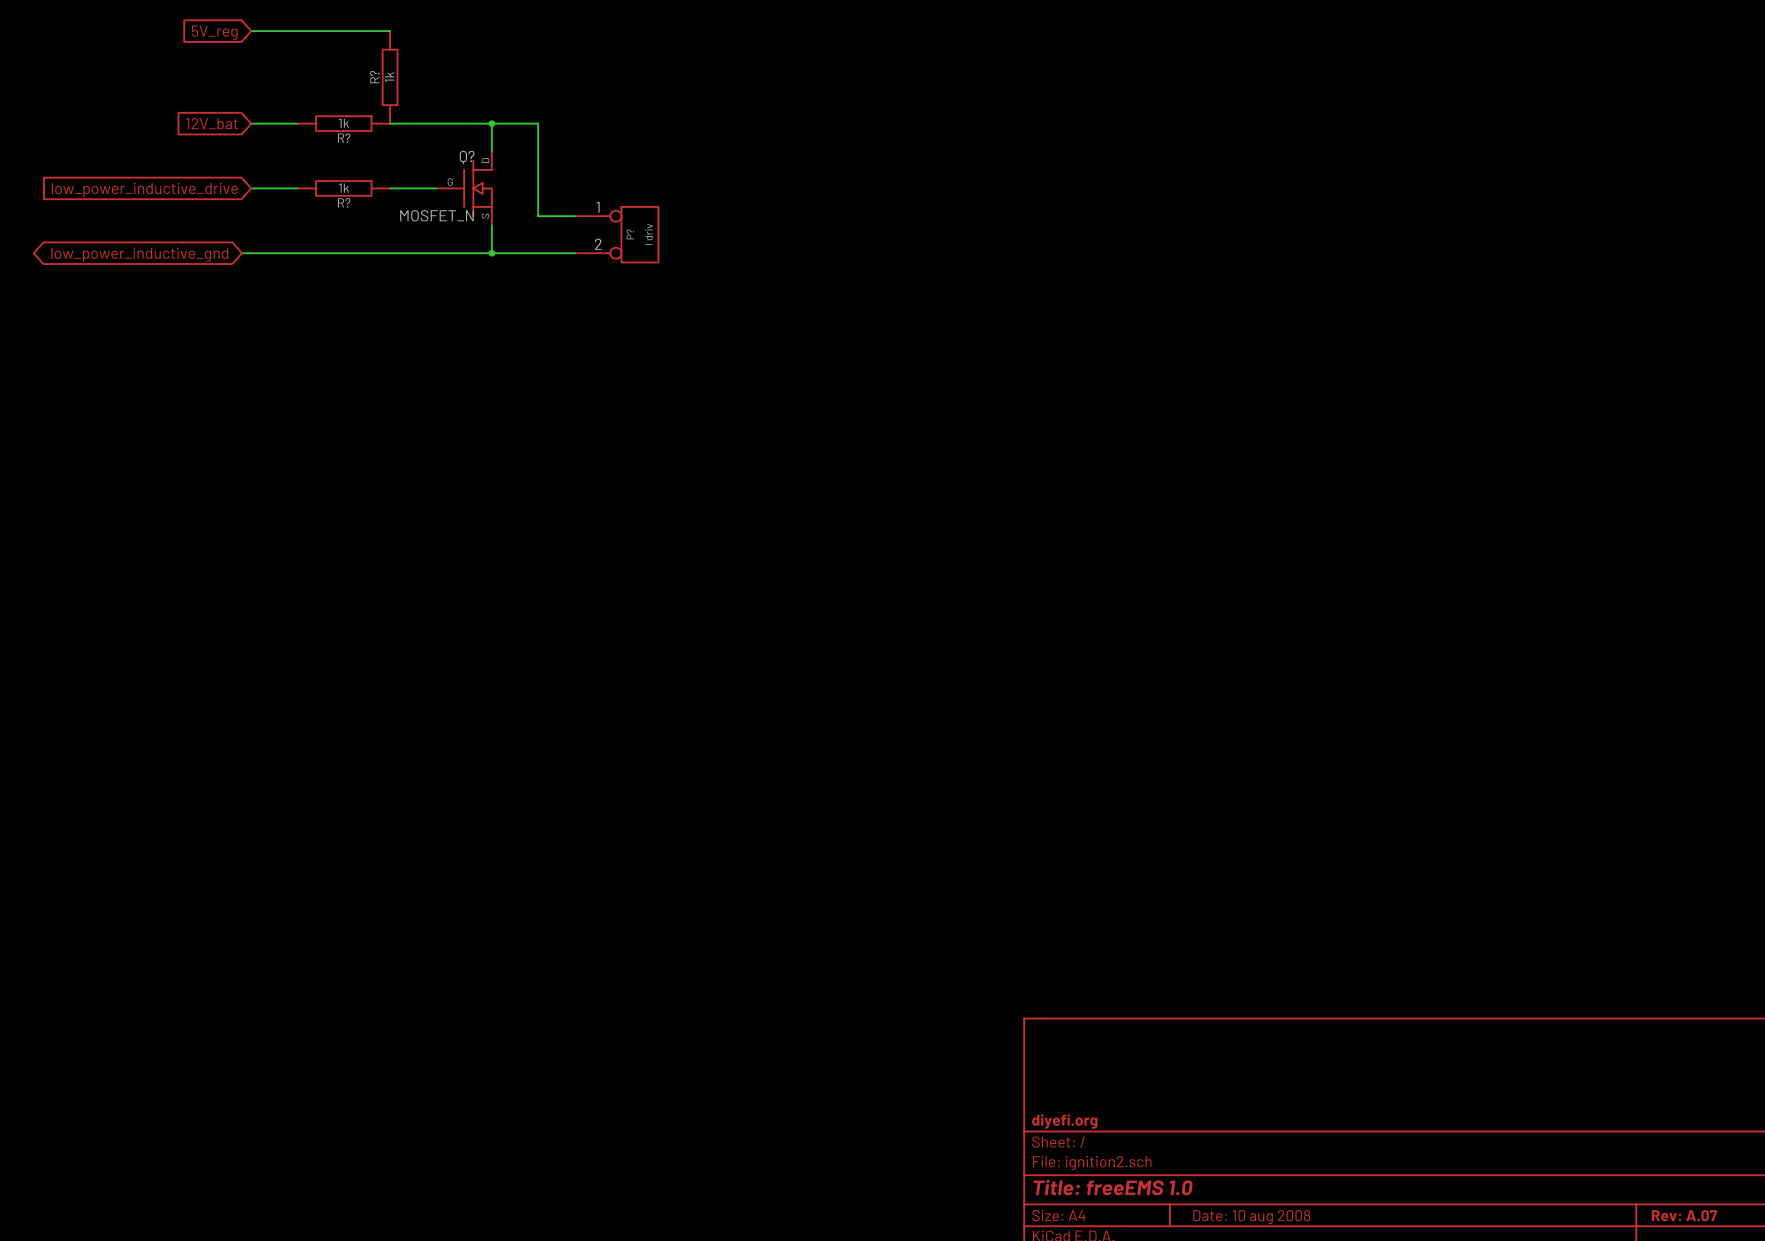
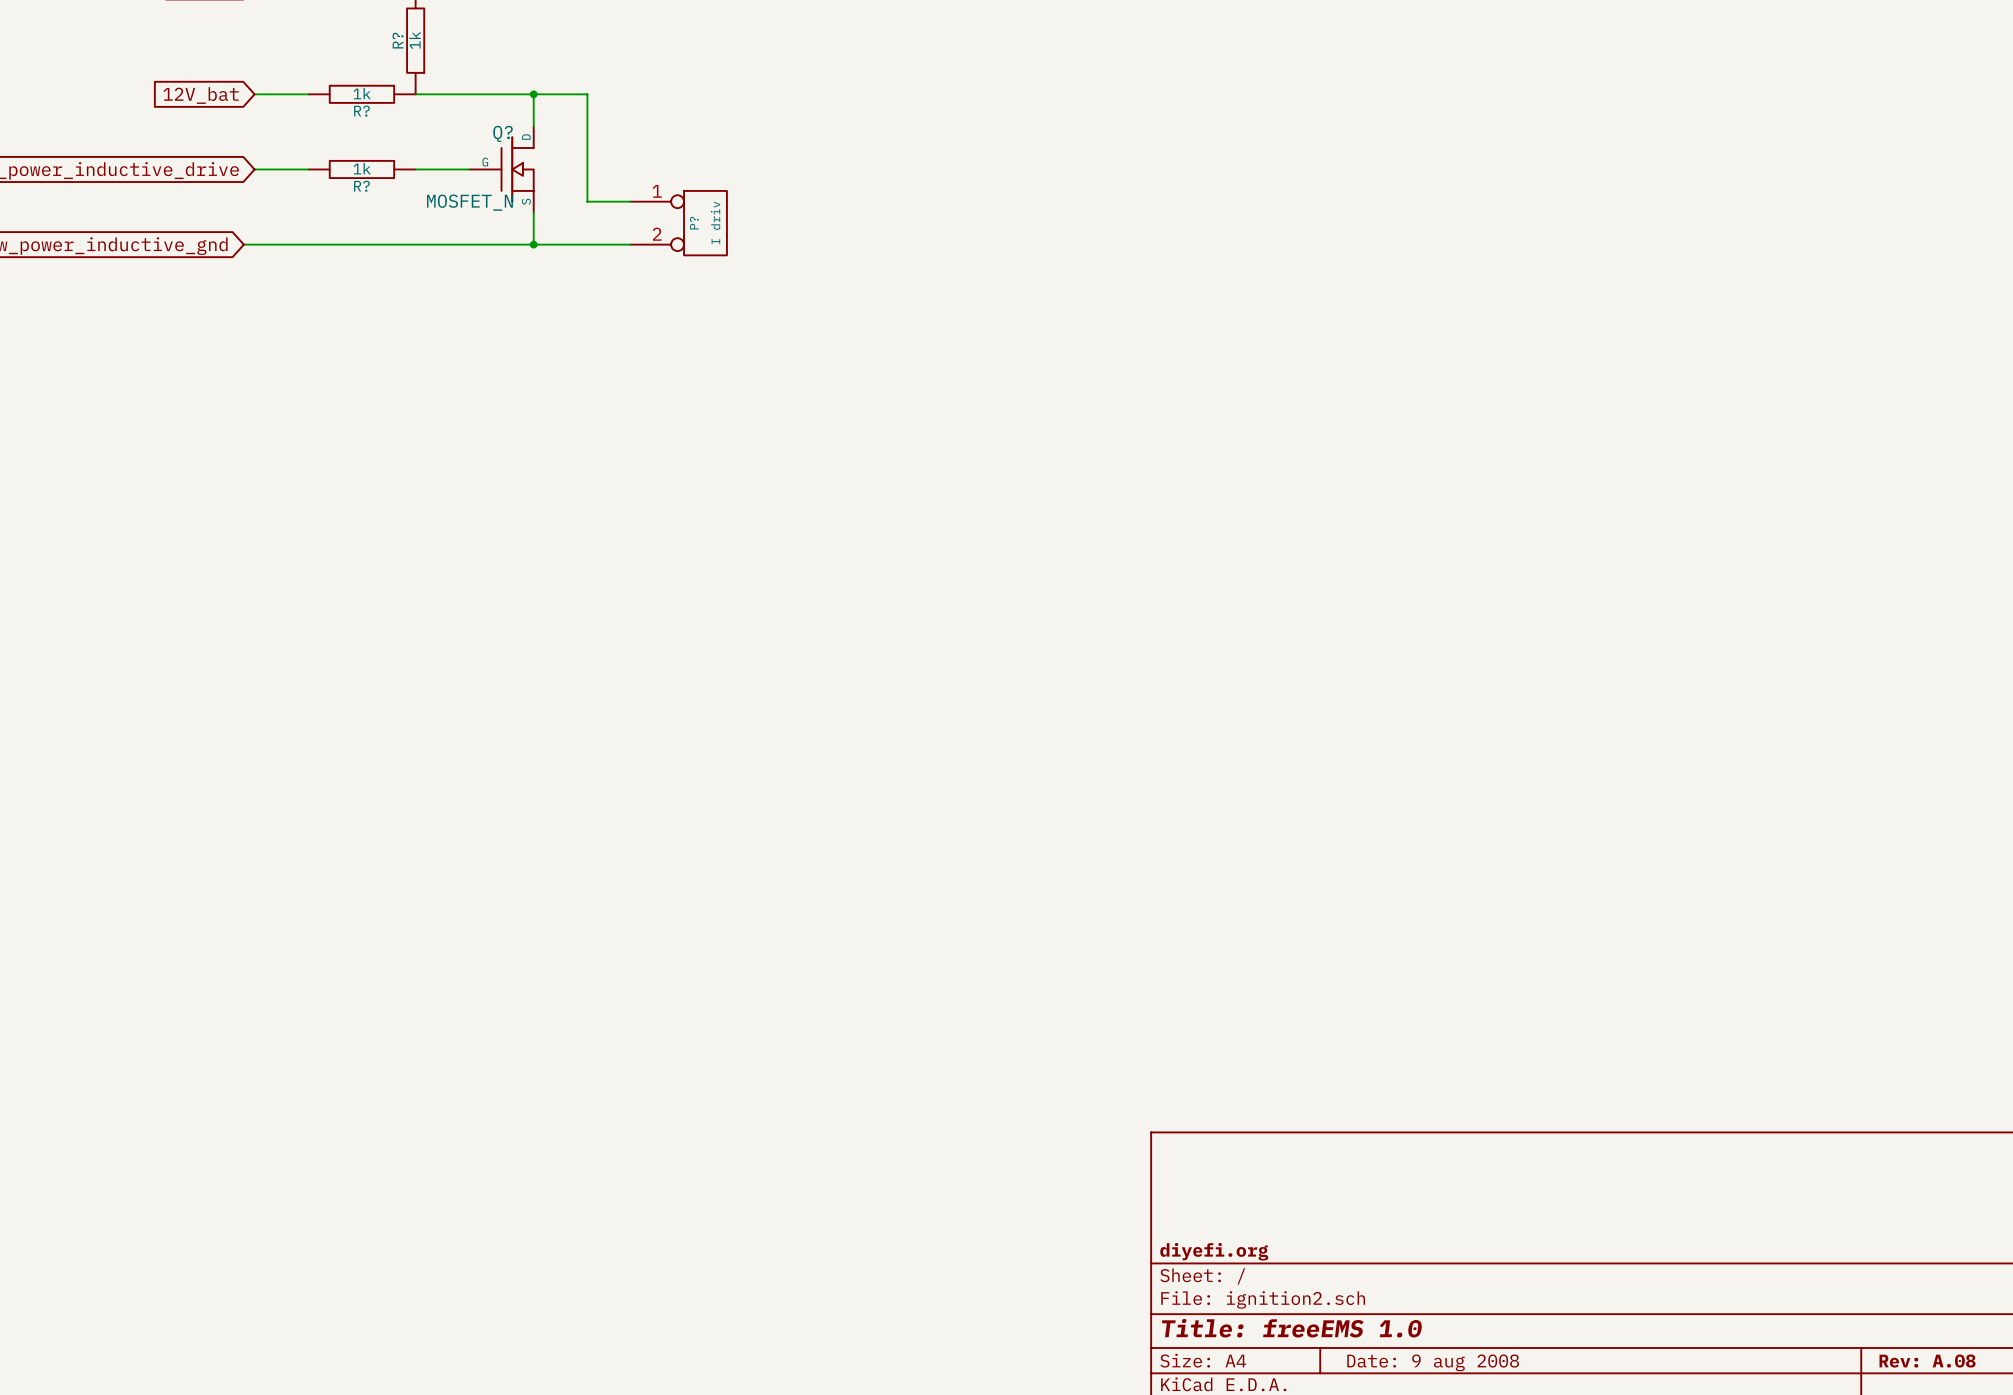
title block: Rev: A.07 (1684, 1215) -> Rev: A.08 (1927, 1361)
title block: Date: 10 aug 2008 (1251, 1217) -> Date: 9 aug 2008 (1433, 1362)

